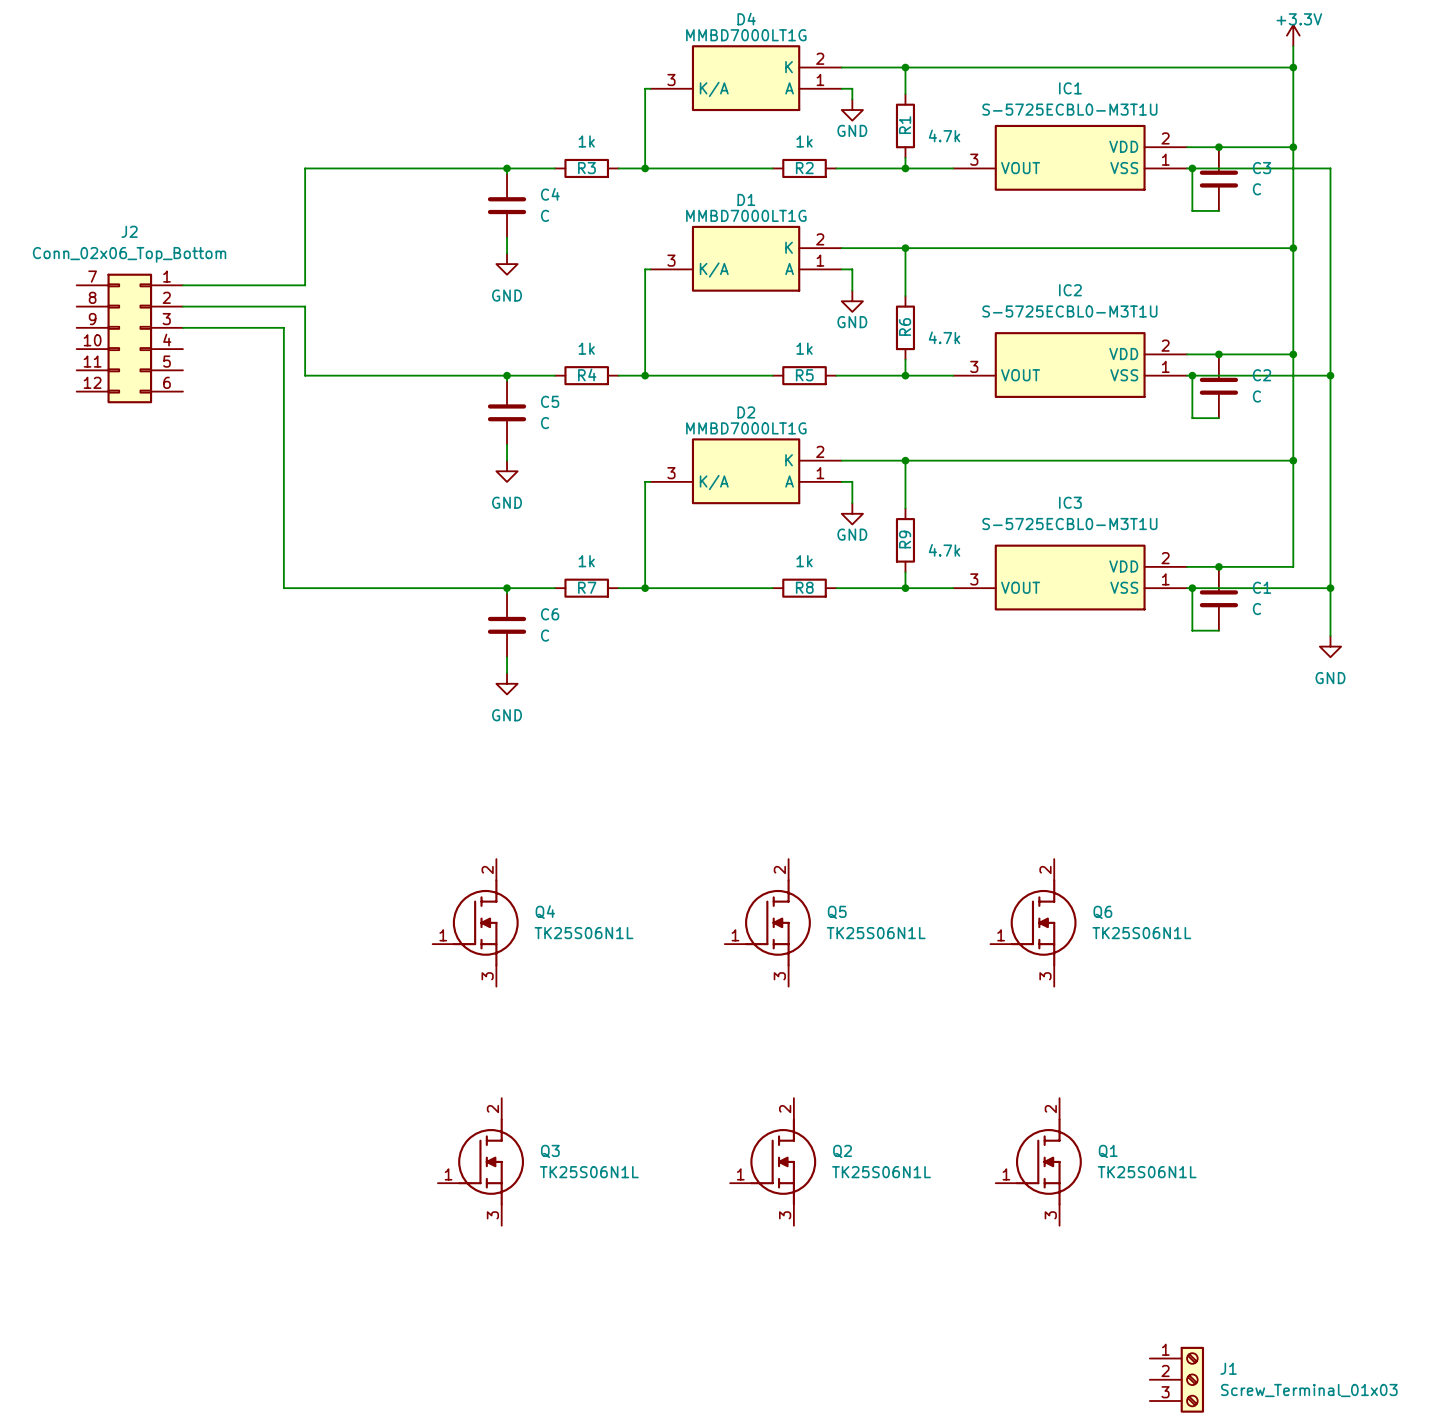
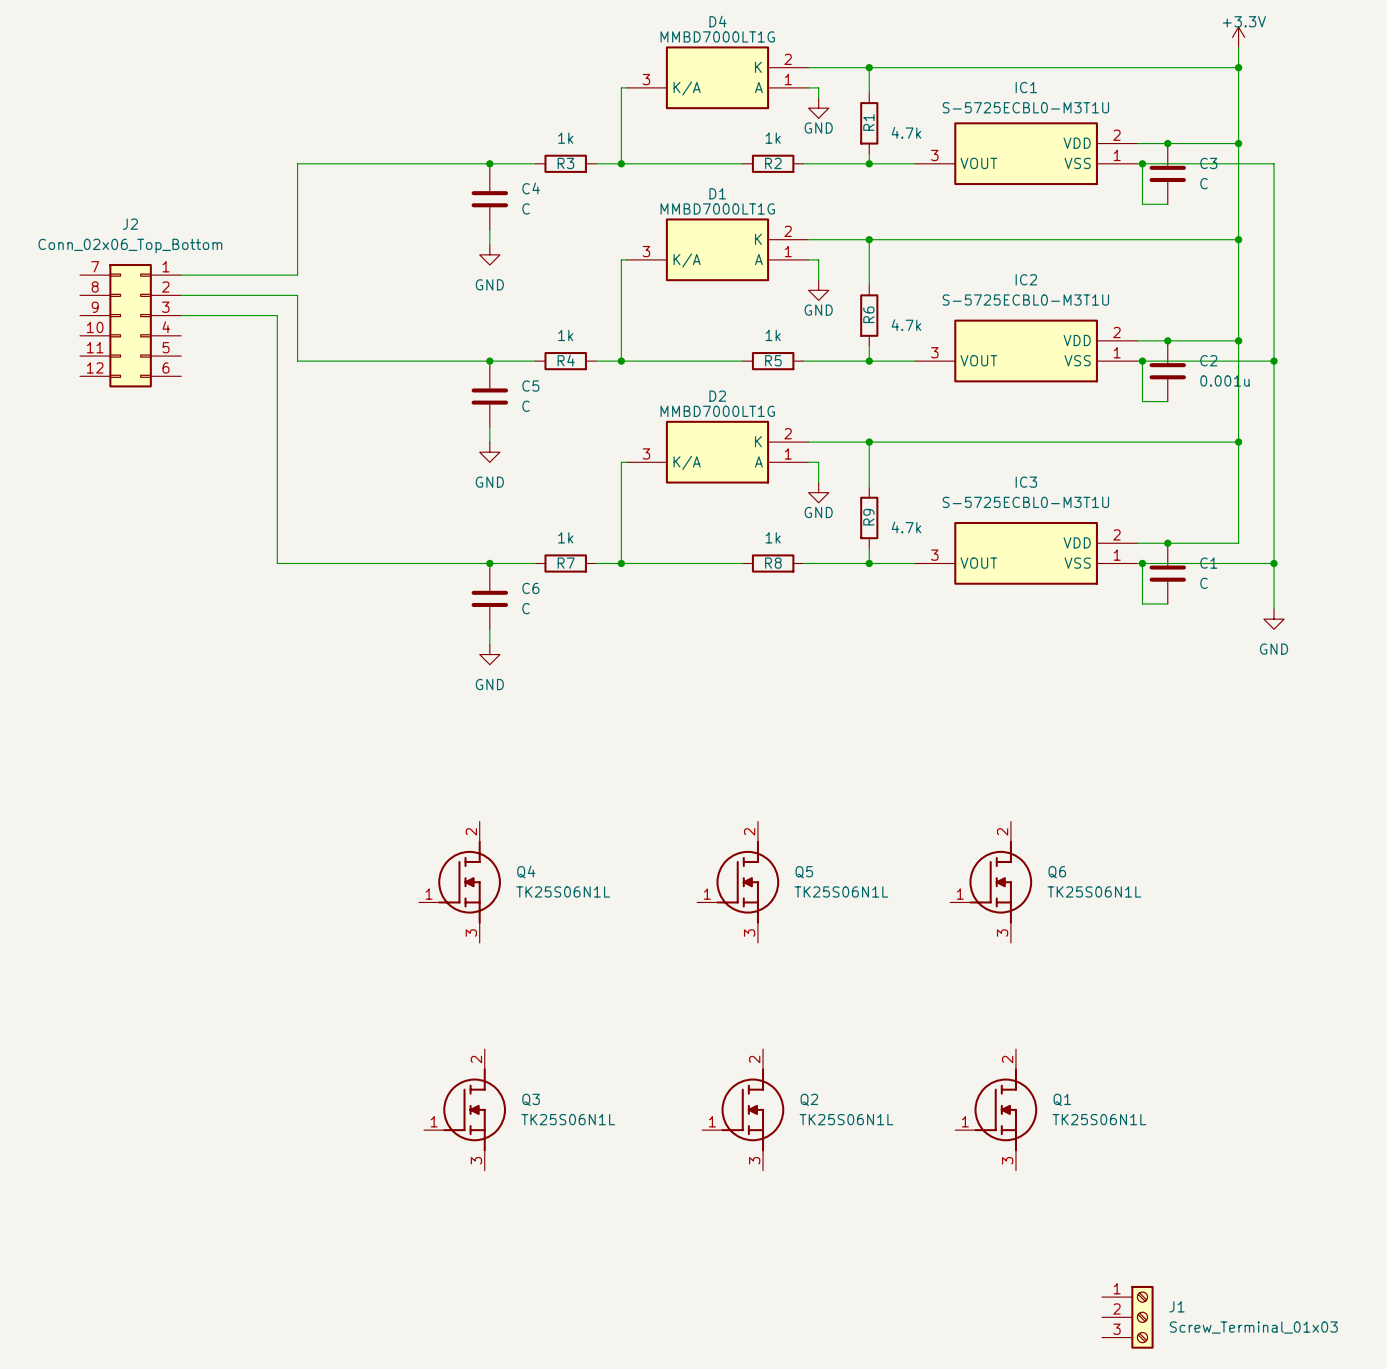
C2 value: C (1256, 396) -> 0.001u (1224, 380)

